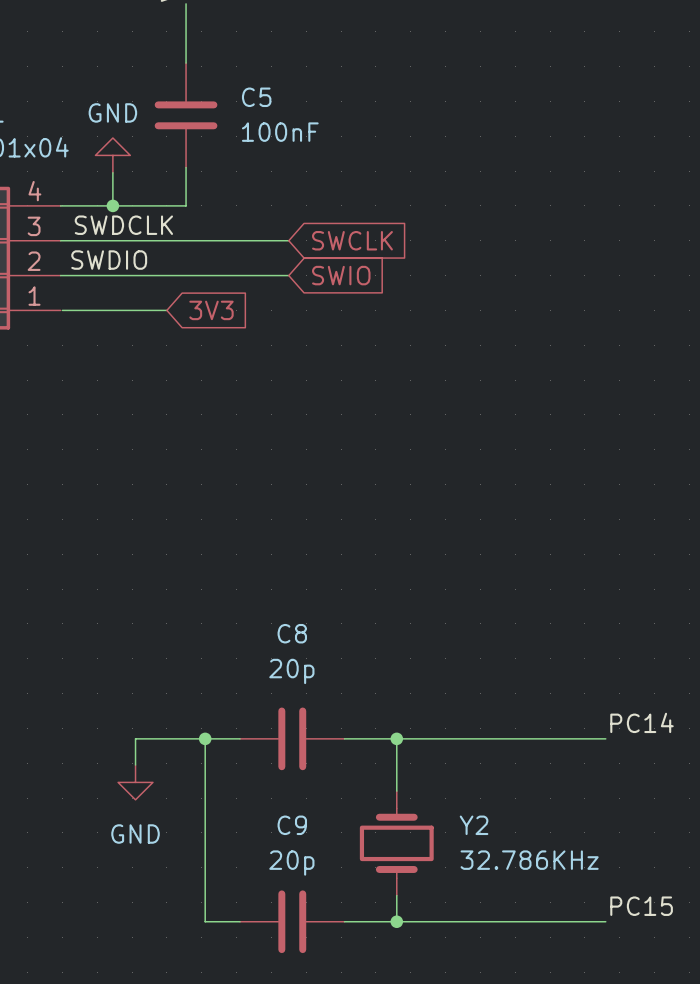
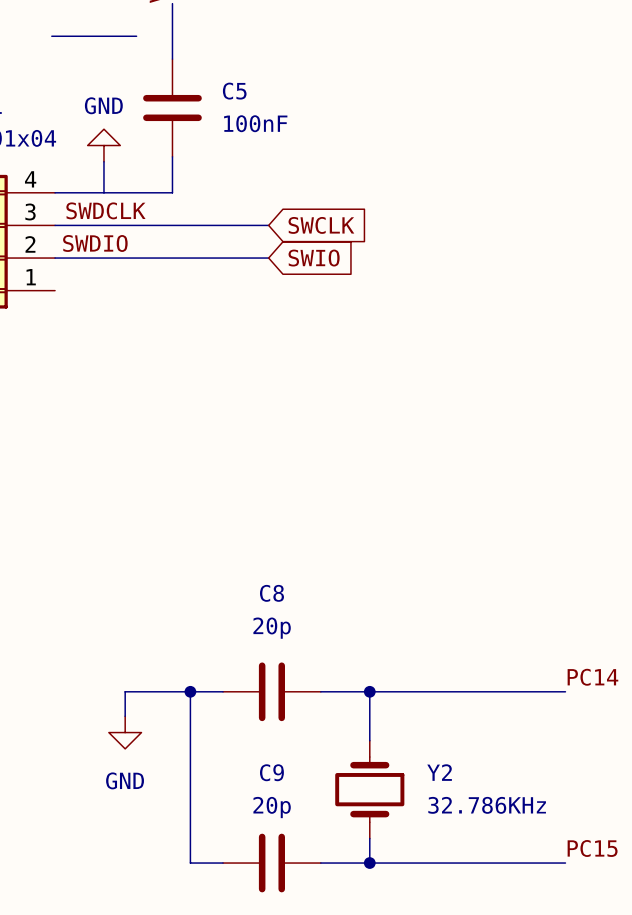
wire: none -> (51, 36) (136, 36)
junction: (112, 205) -> none
wire: (62, 310) (166, 310) -> none
global label: 3V3 (211, 310) -> none

